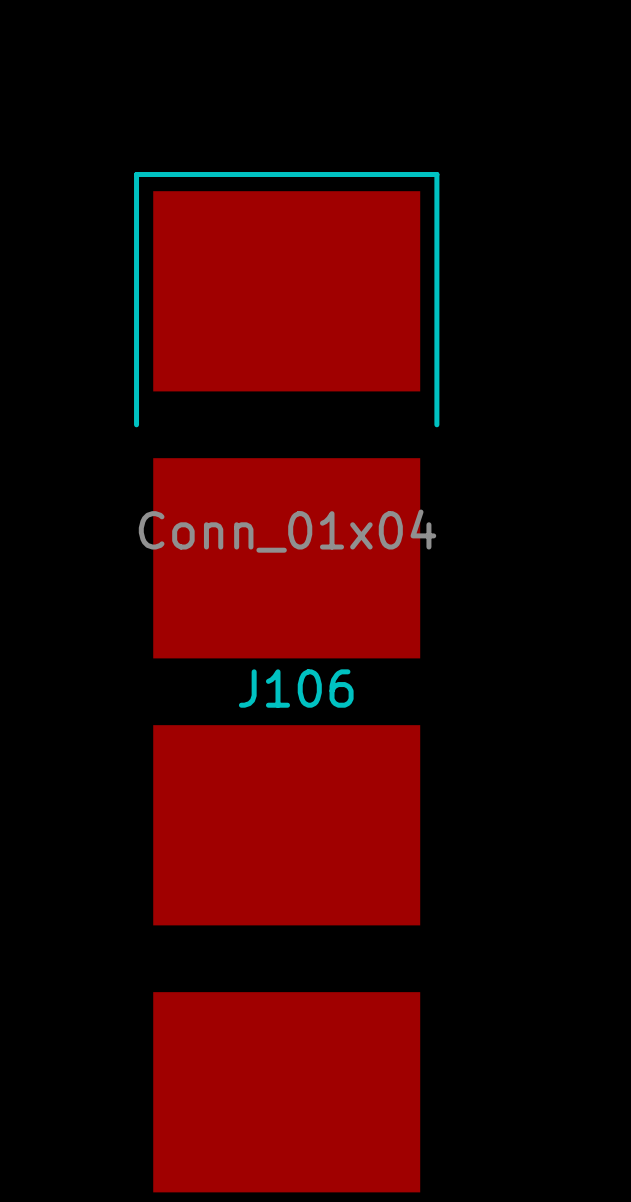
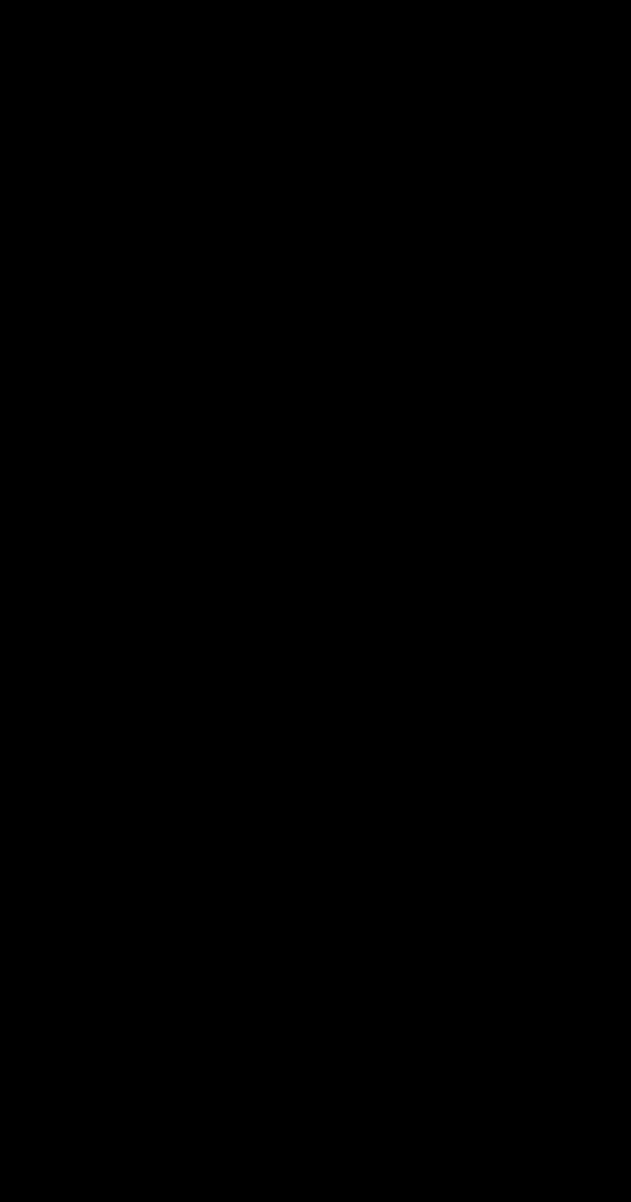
J106: Conn_01x04 (286, 682) -> none

